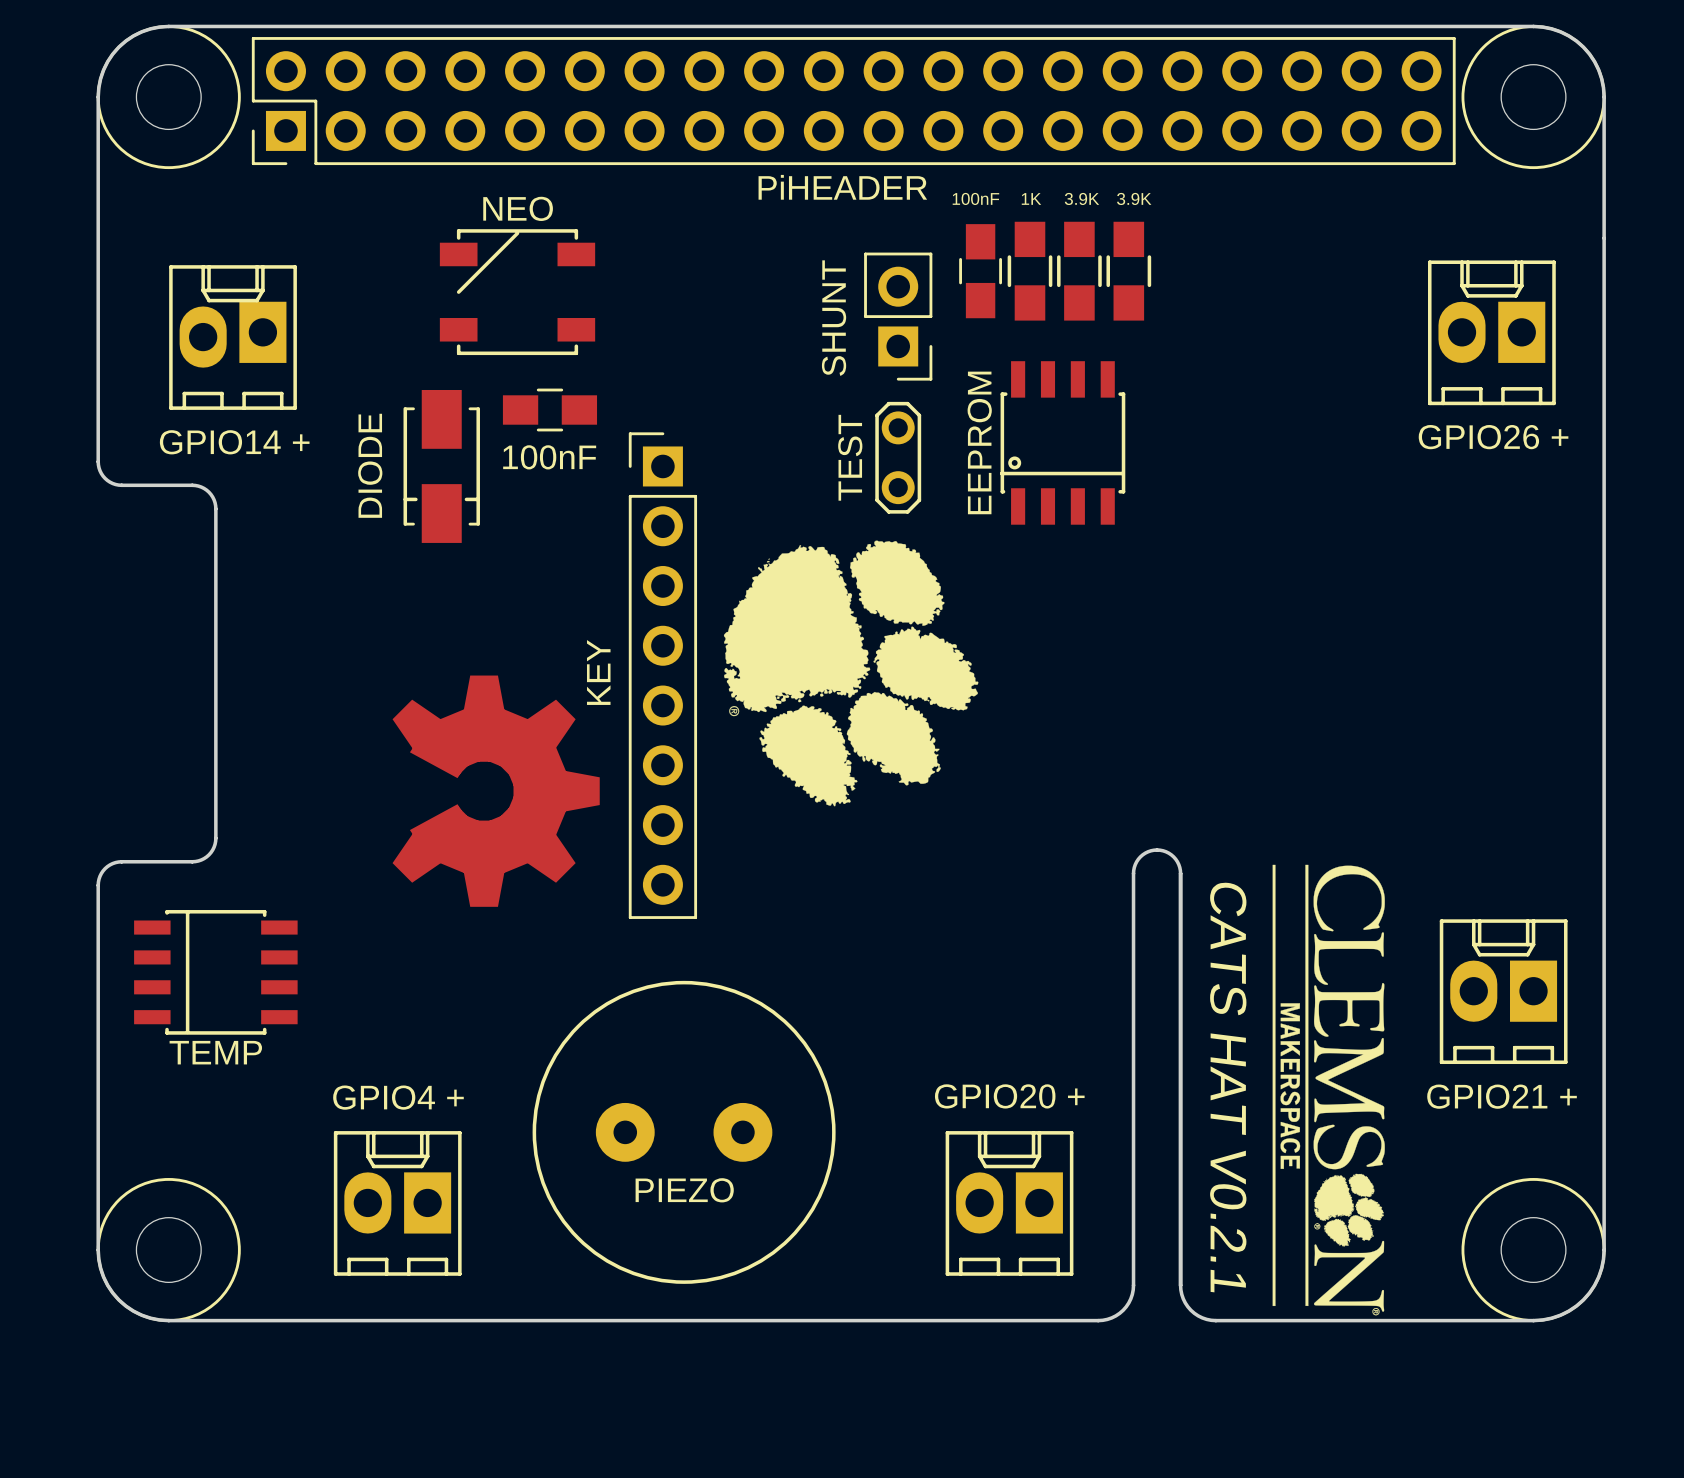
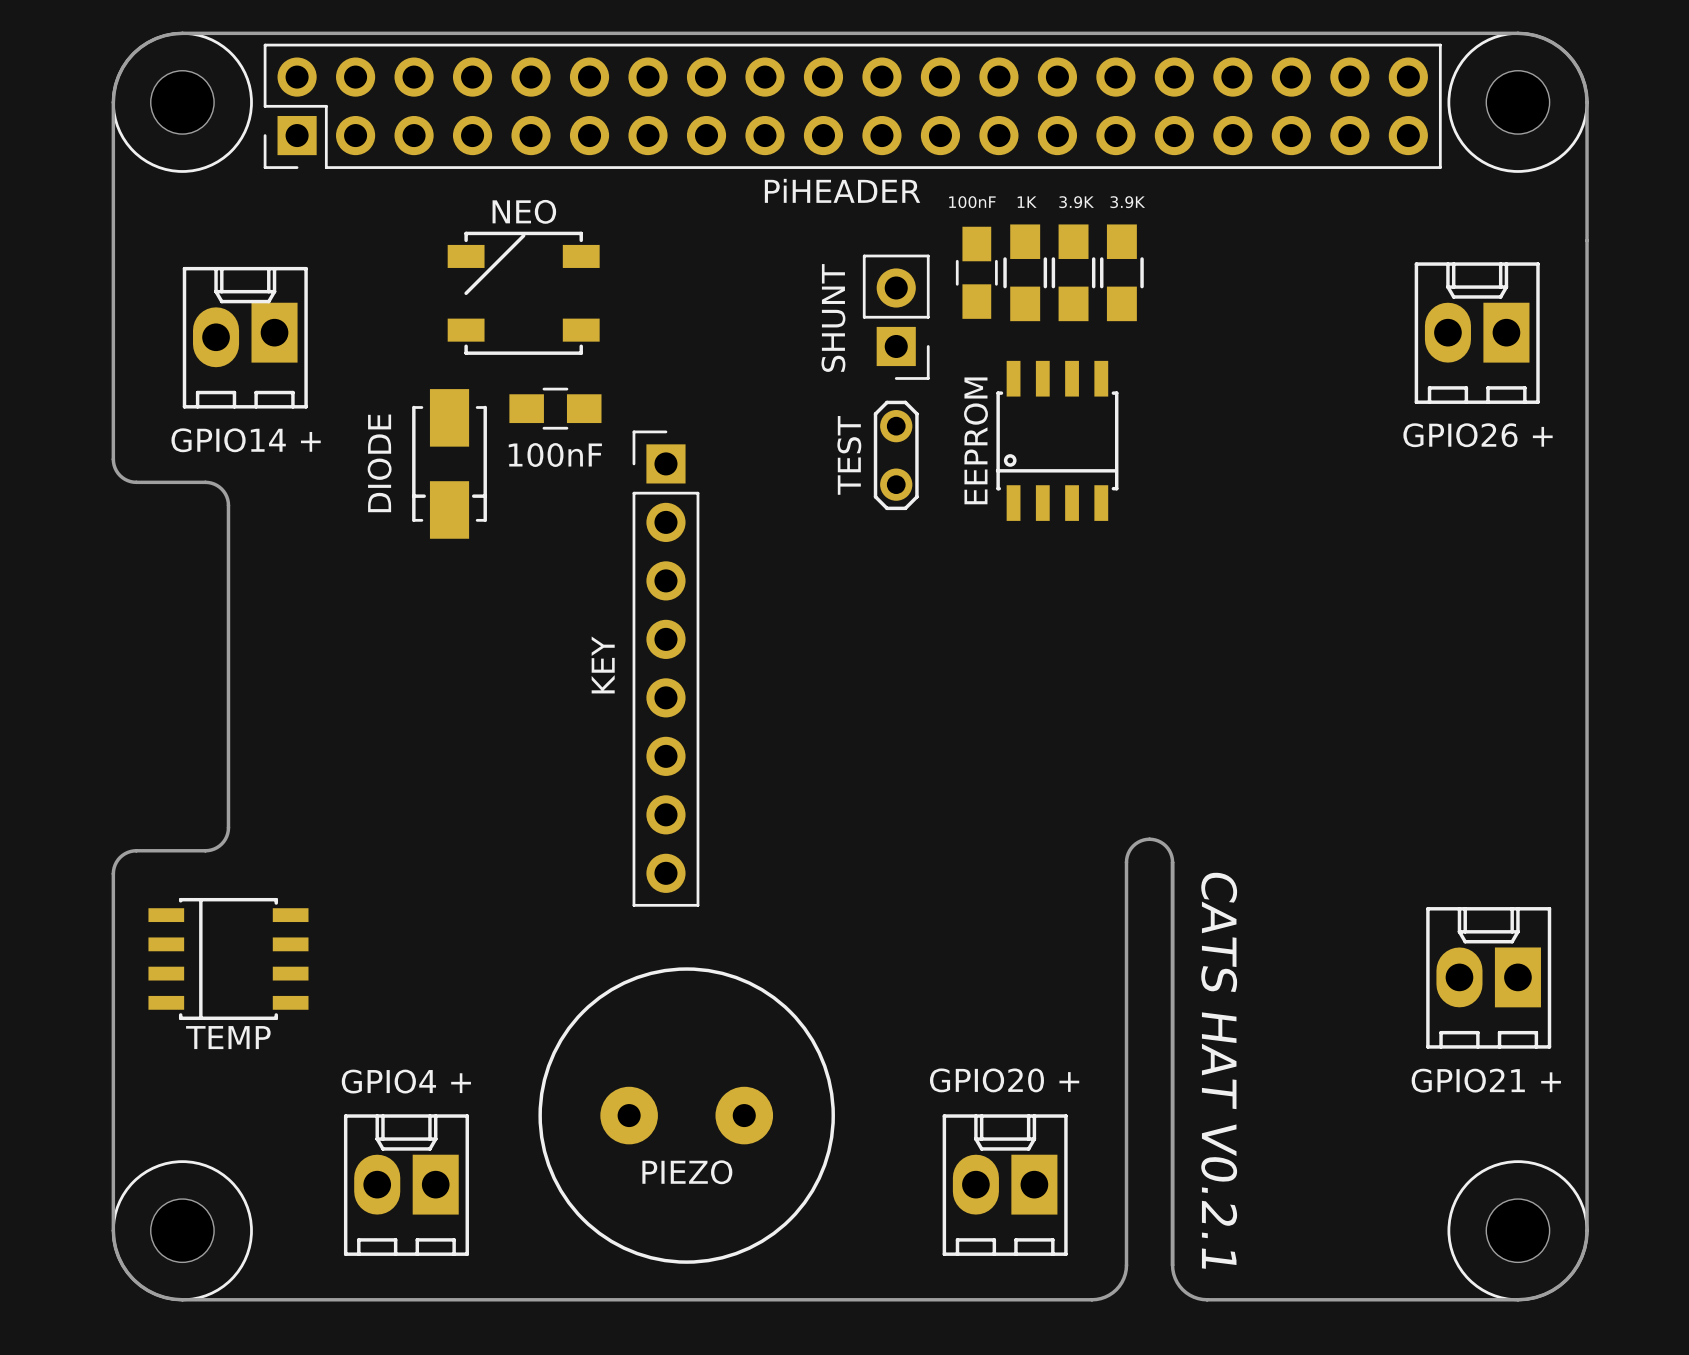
drawing: [723, 540, 979, 807] -> none
part: (496, 791) -> none
drawing: [1272, 864, 1385, 1316] -> none

